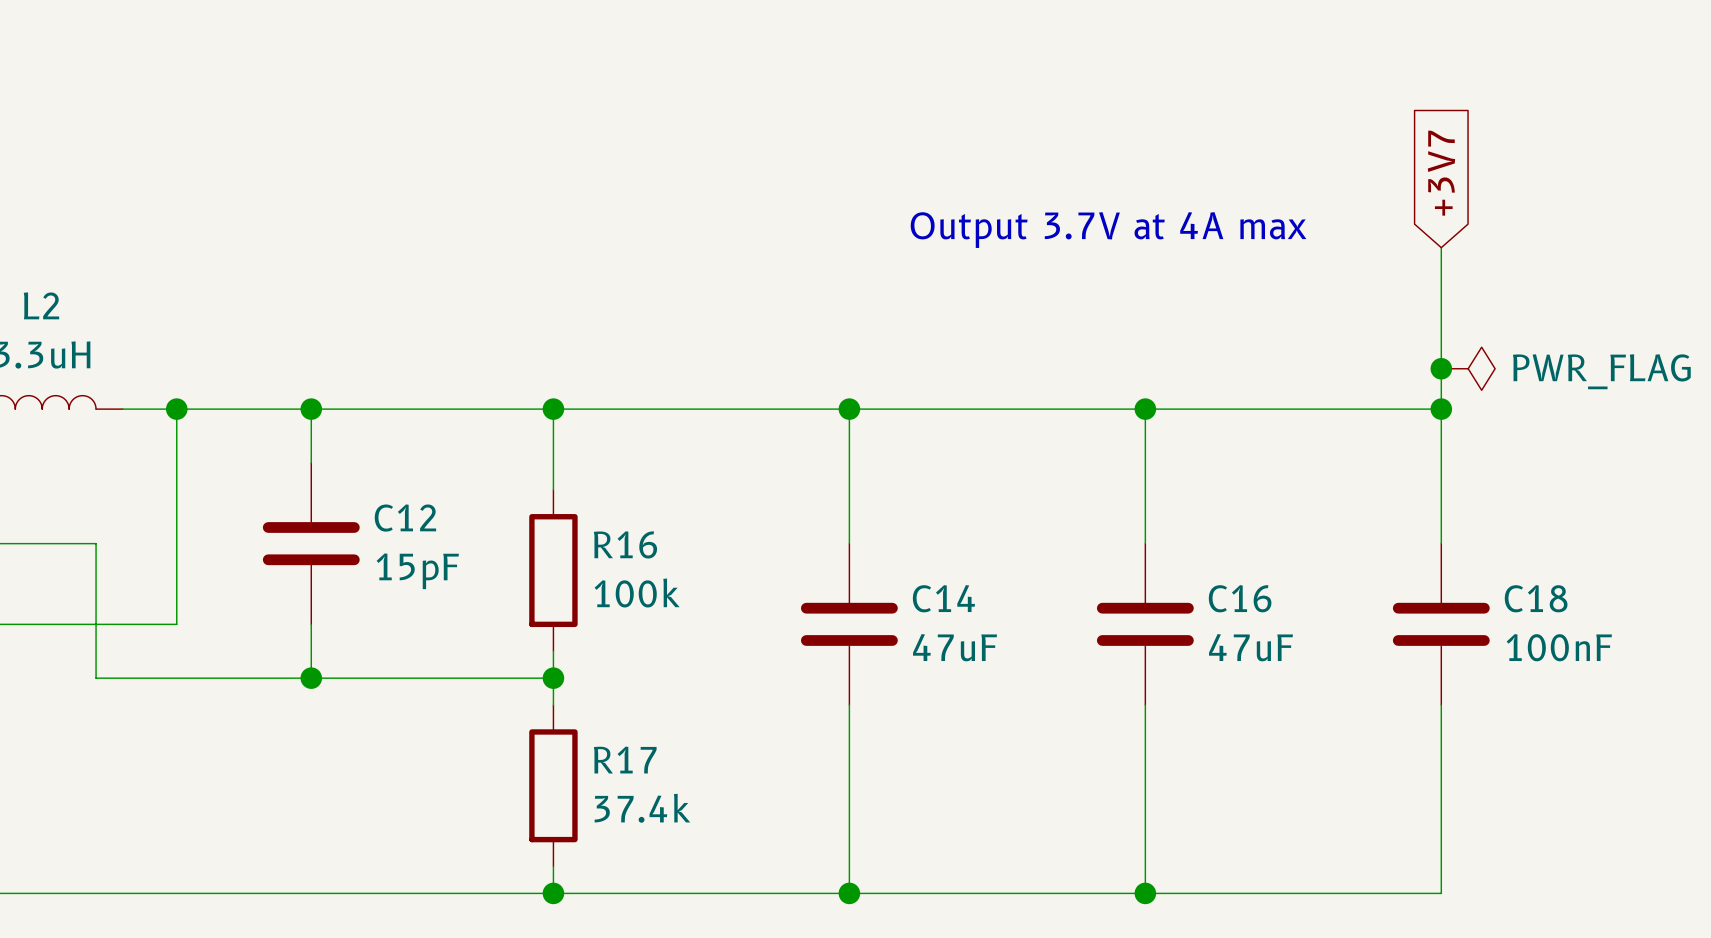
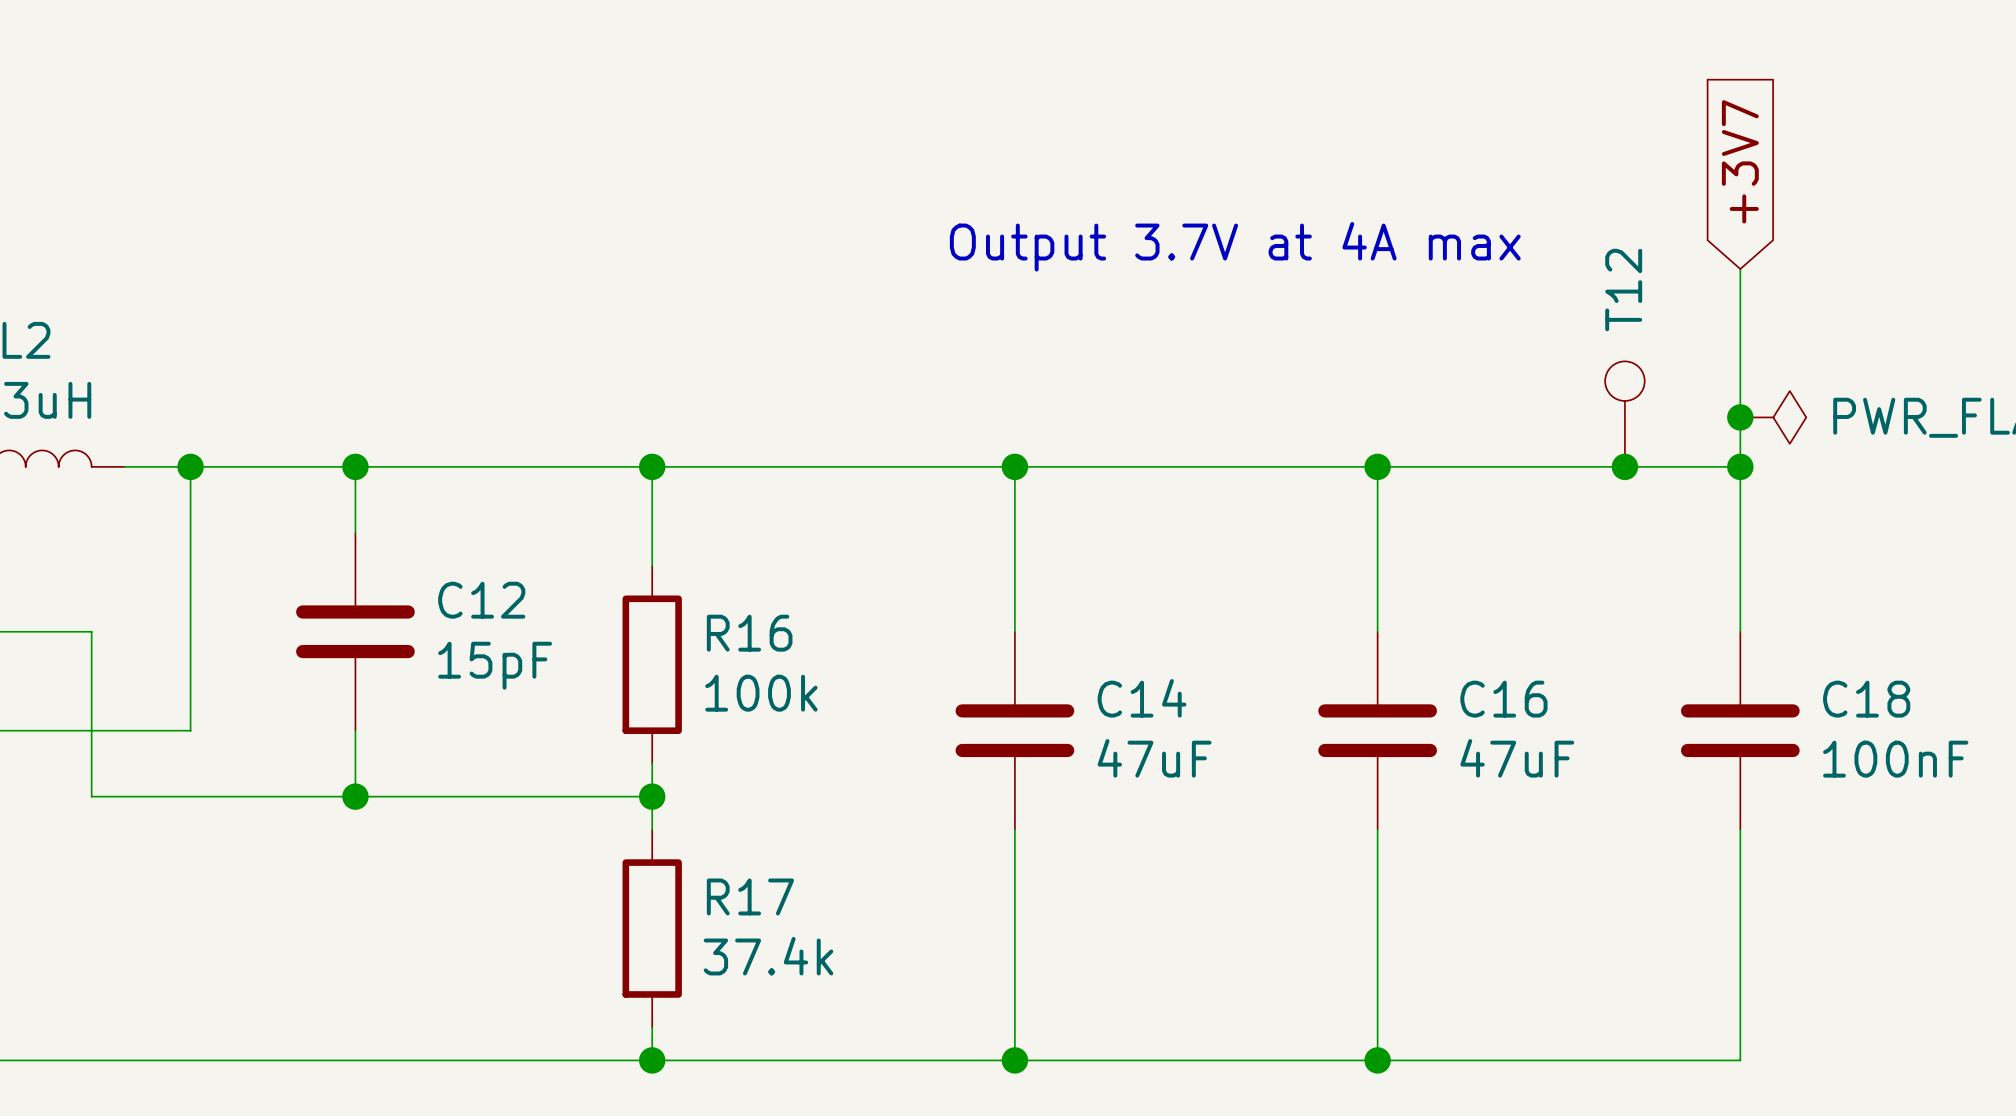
text position: Output 3.7V at 4A max (1108, 230) -> Output 3.7V at 4A max (1235, 246)
T12: none -> (1624, 414)
junction: none -> (1624, 466)

